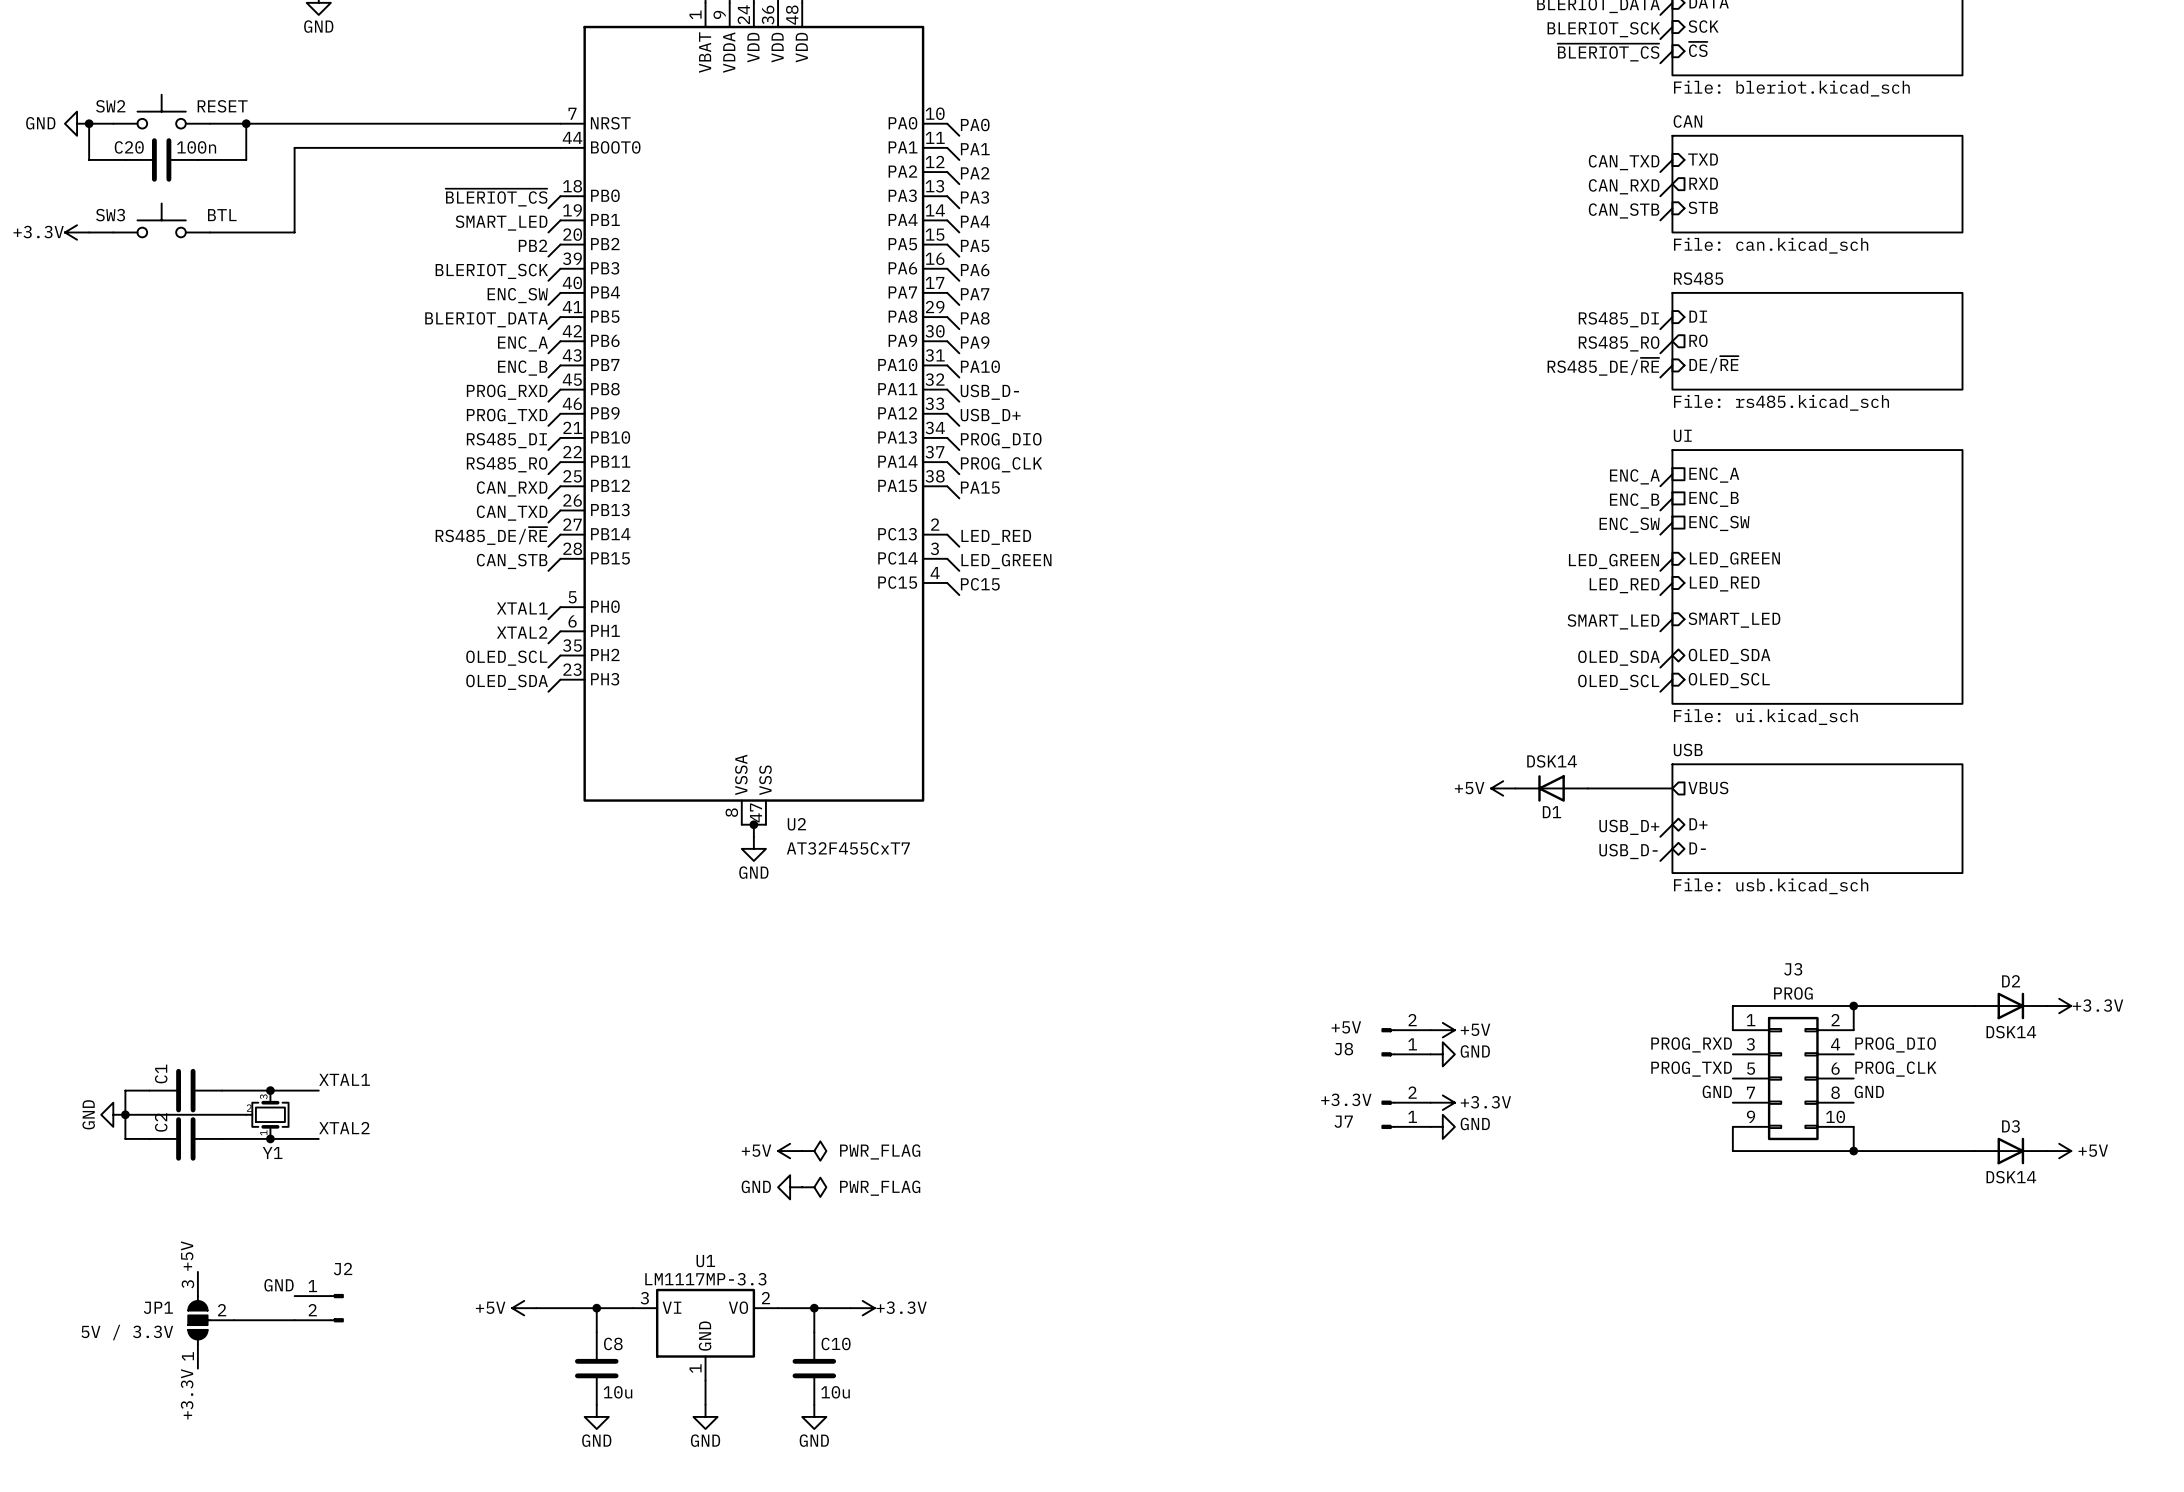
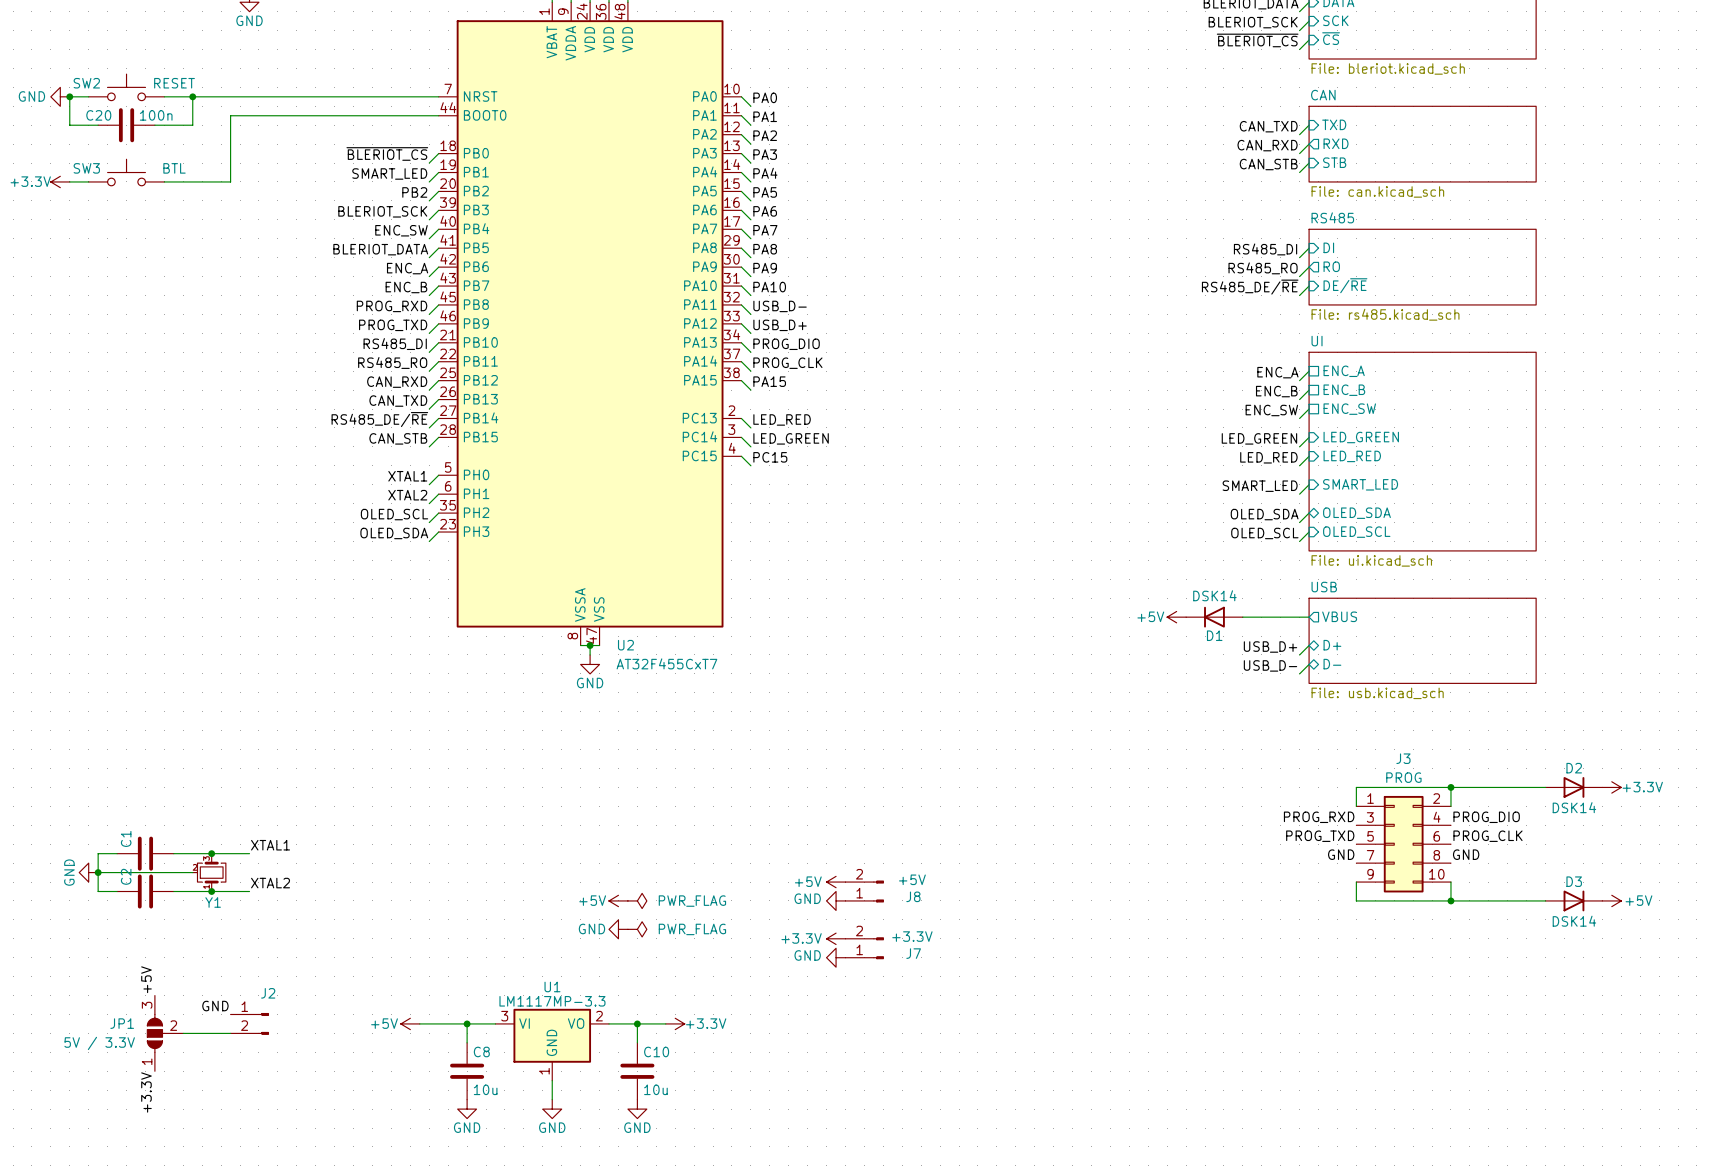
power symbol: +5V (1442, 1030) -> none
J8 flip: as is (1388, 1042) -> left-right (878, 891)
J8 position: (1406, 1042) -> (864, 891)
power symbol: GND (1442, 1054) -> none
power symbol: +3.3V (1442, 1102) -> none
J7 flip: as is (1388, 1114) -> left-right (878, 948)
J7 position: (1406, 1114) -> (864, 948)
power symbol: none -> +5V (836, 882)
power symbol: GND (1442, 1126) -> none
power symbol: none -> GND (836, 900)
power symbol: none -> +3.3V (836, 938)
power symbol: none -> GND (836, 957)

